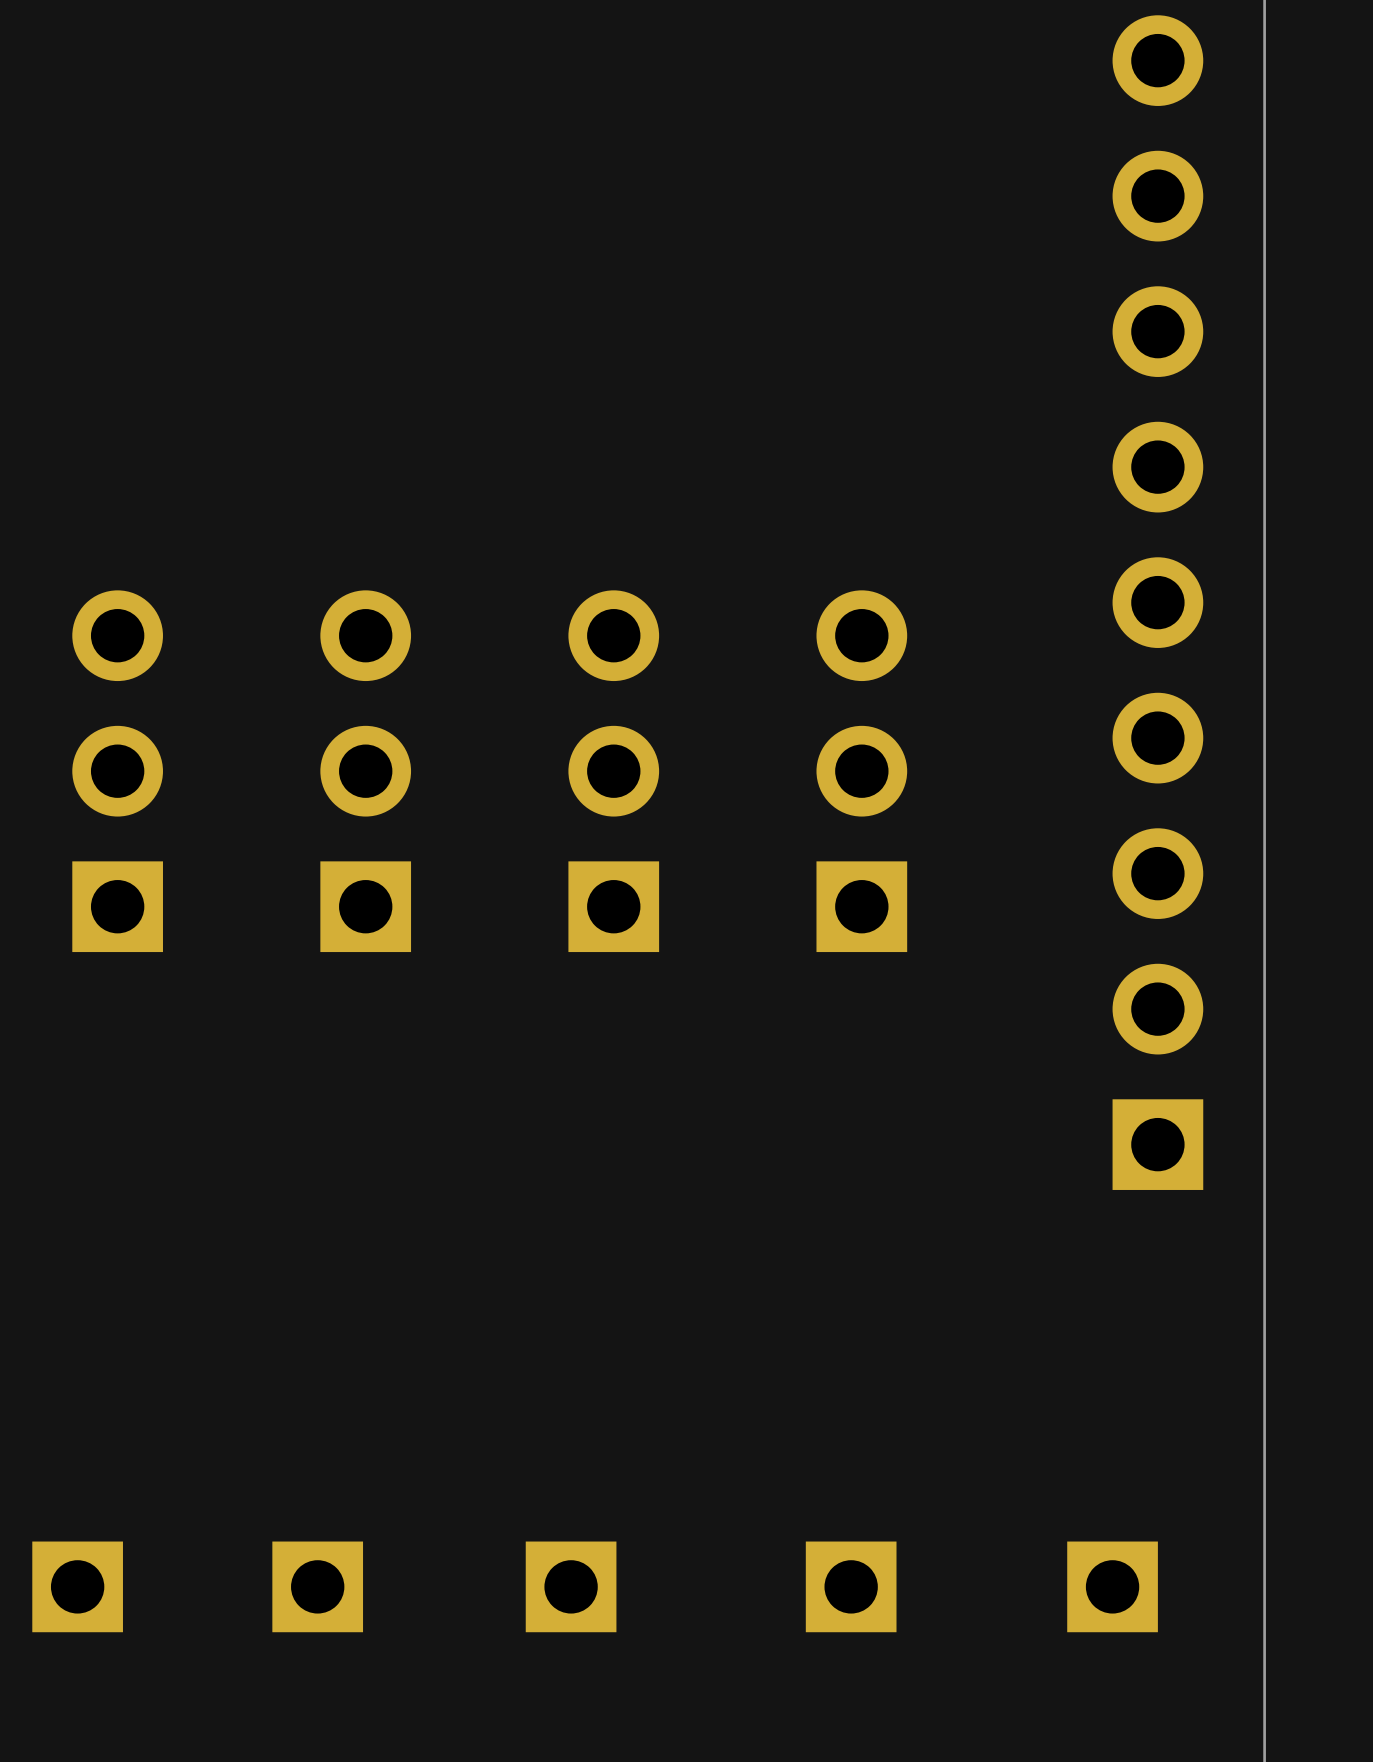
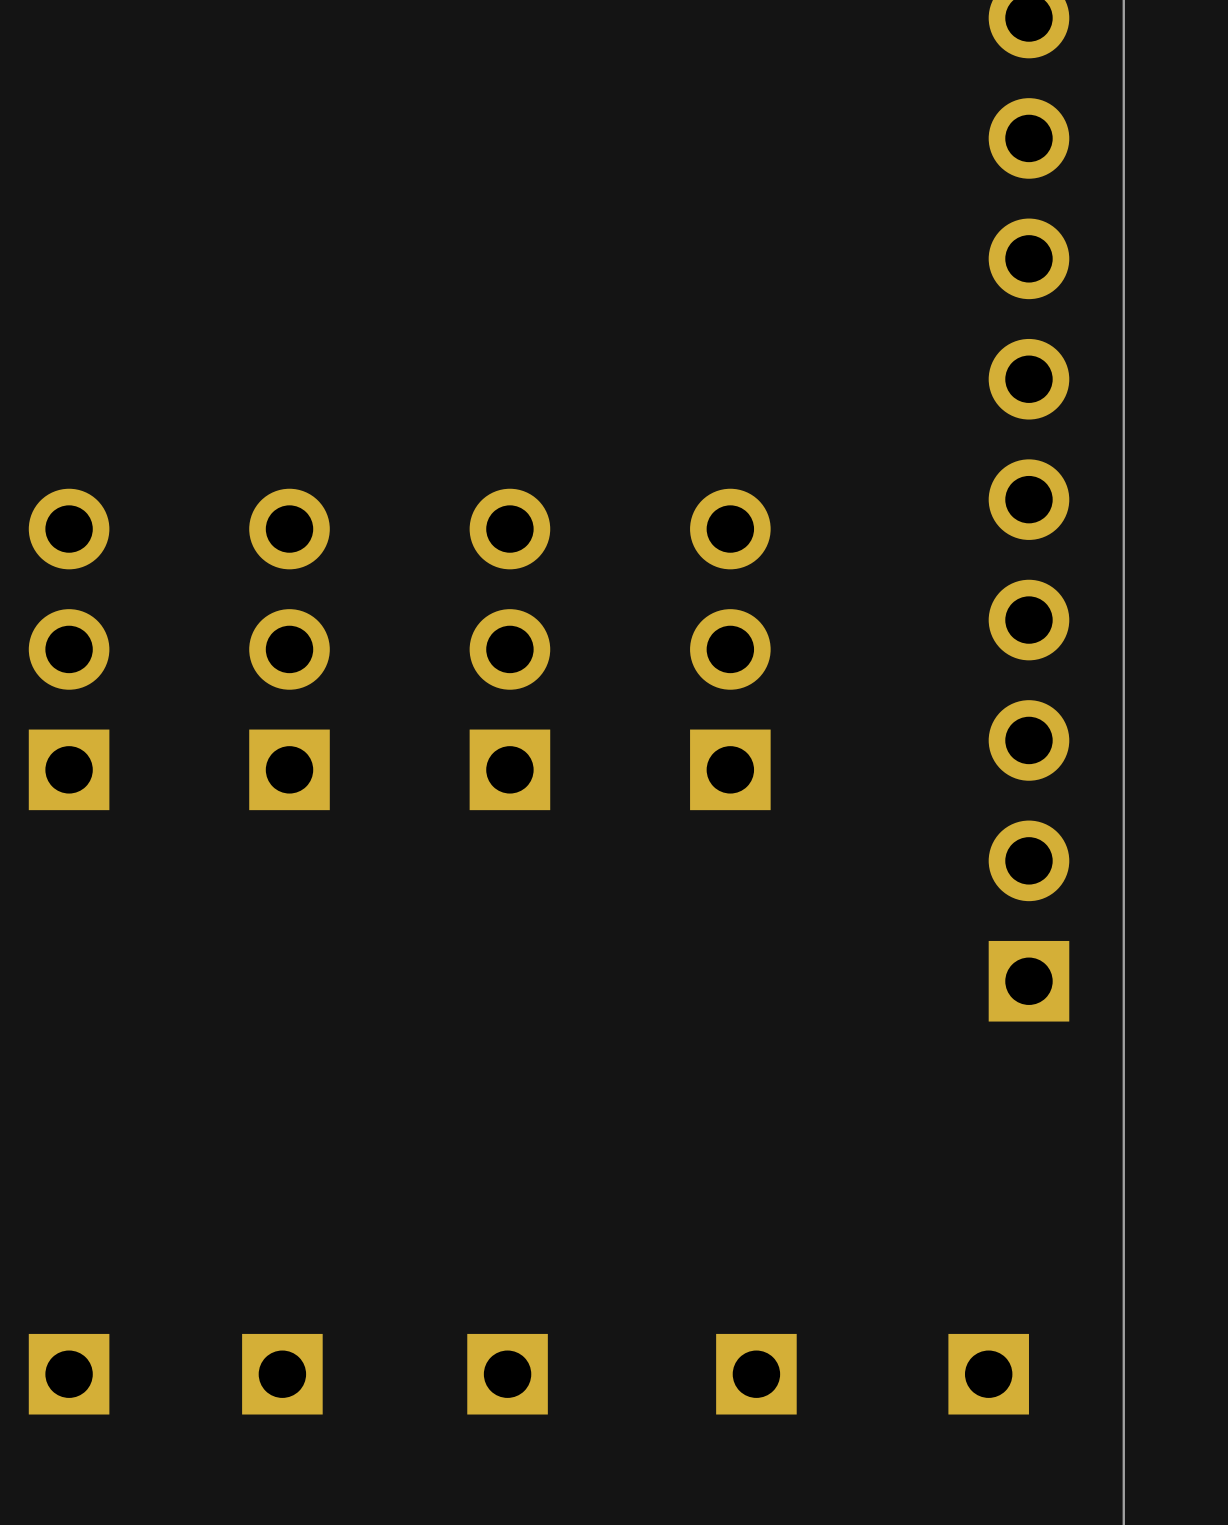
part position: (117, 771) -> (69, 649)
part position: (365, 771) -> (289, 649)
part position: (613, 771) -> (509, 649)
part position: (861, 771) -> (730, 649)

